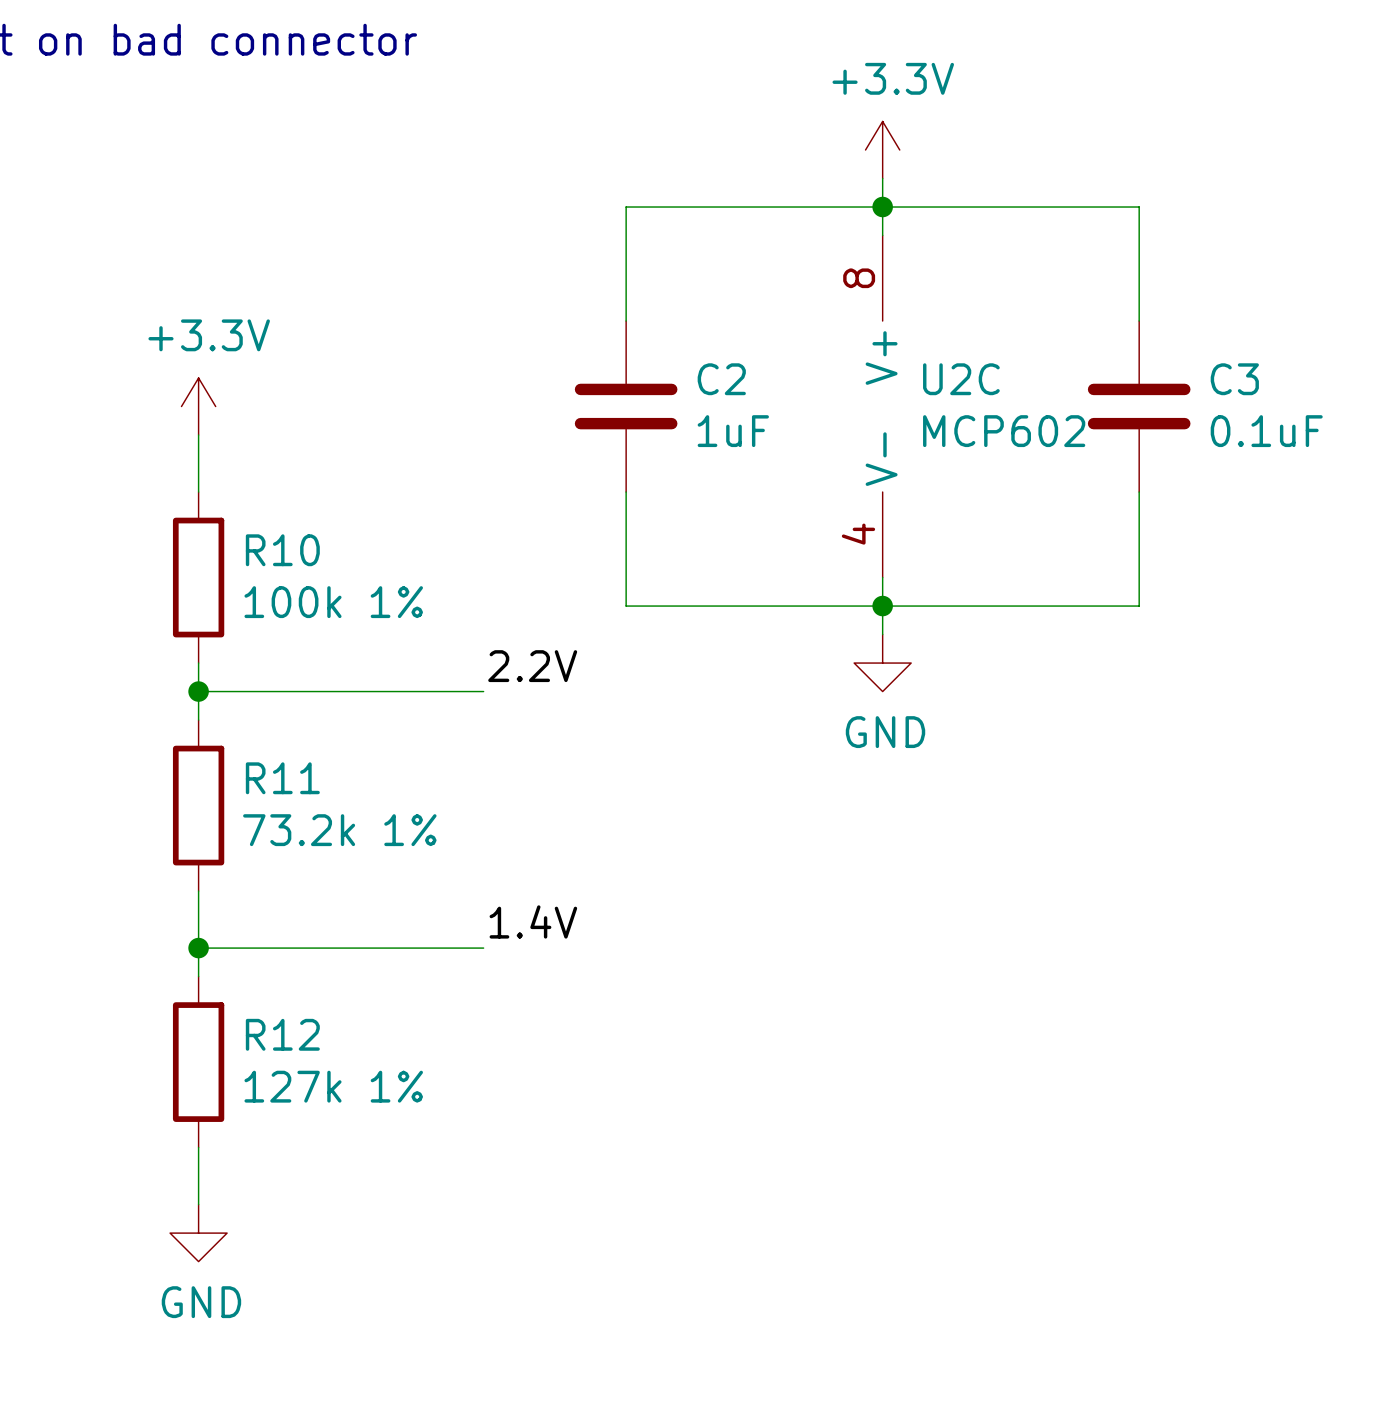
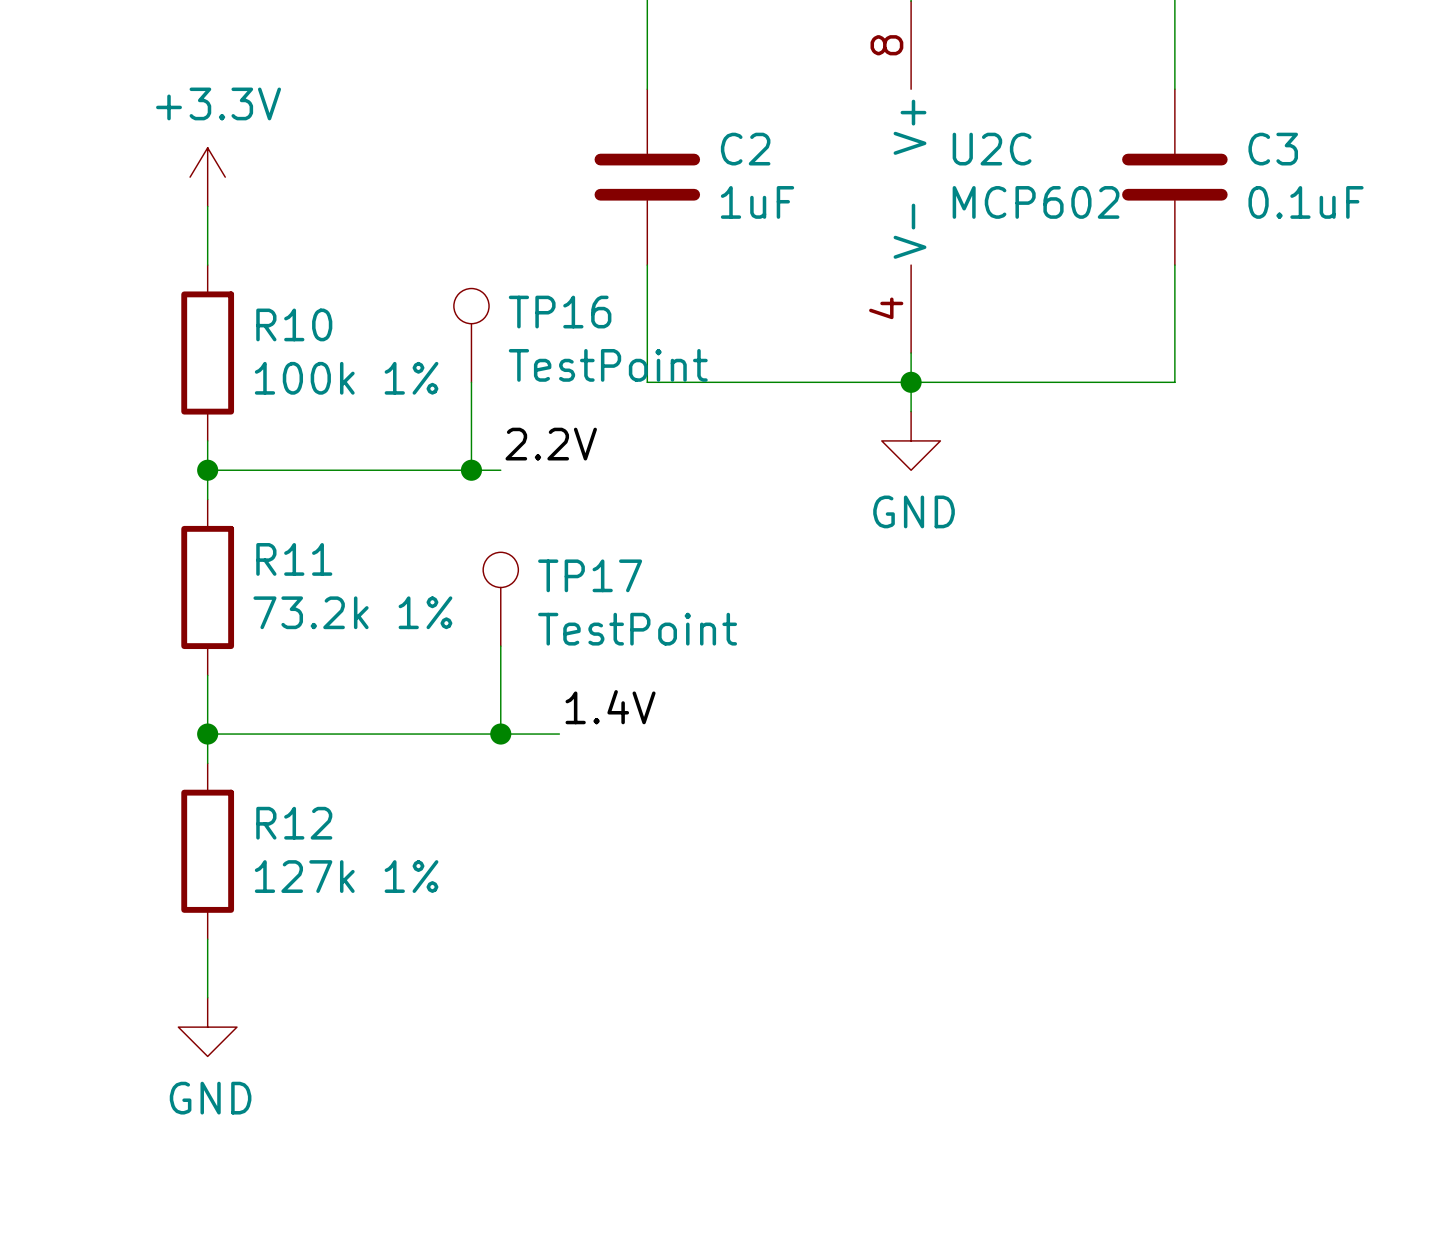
TP16: none -> TestPoint (471, 335)
wire: none -> (471, 382) (471, 470)
junction: none -> (471, 470)
TP17: none -> TestPoint (500, 599)
wire: none -> (500, 646) (500, 734) (559, 734)
label position: 1.4V (533, 921) -> 1.4V (610, 707)
junction: none -> (500, 734)

